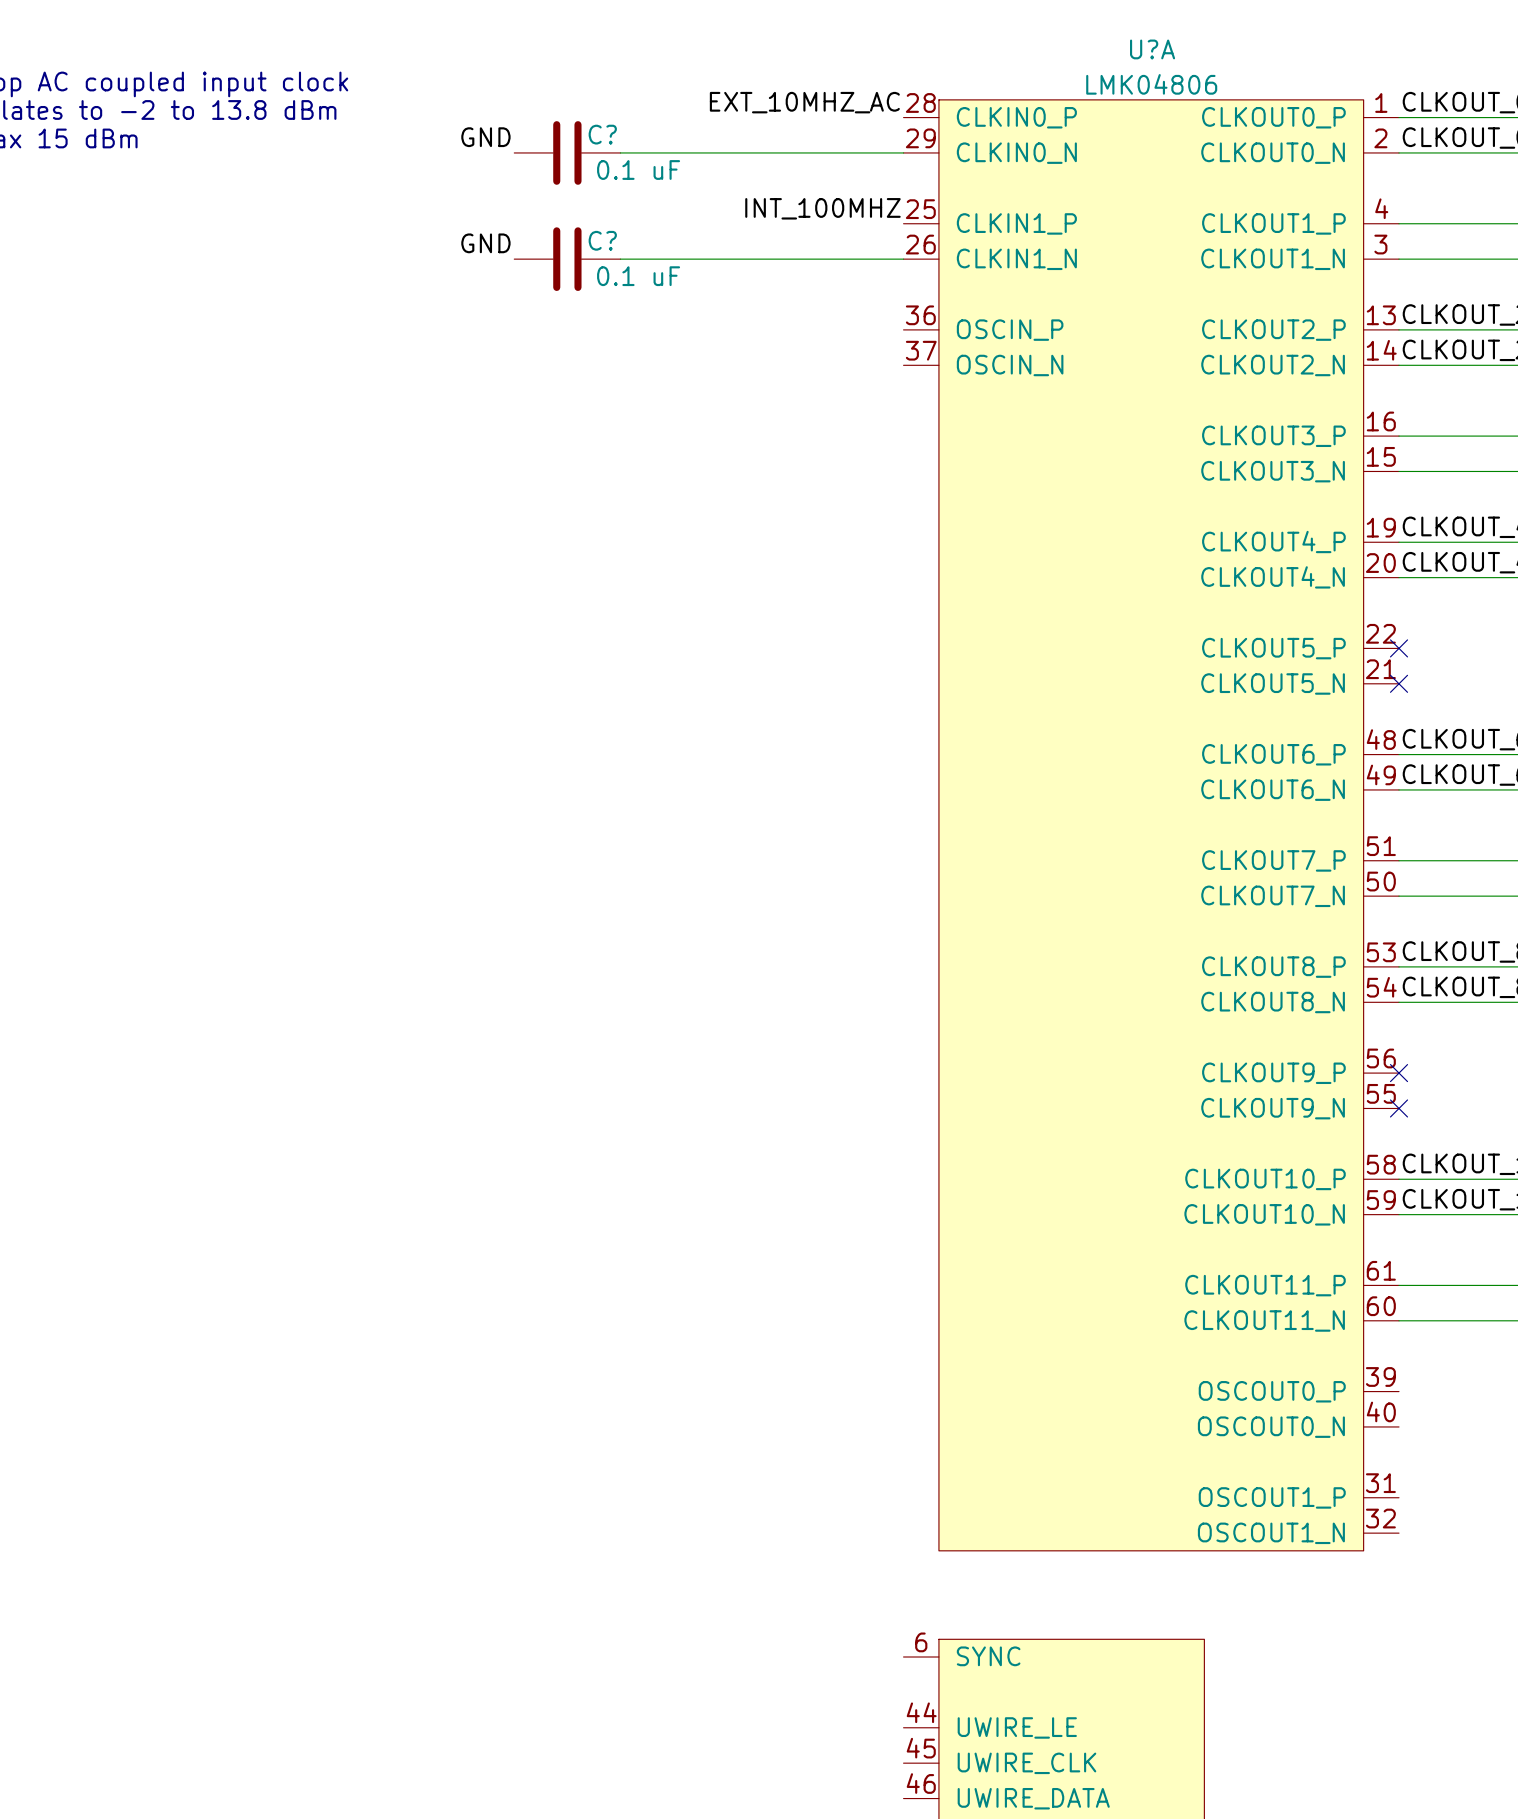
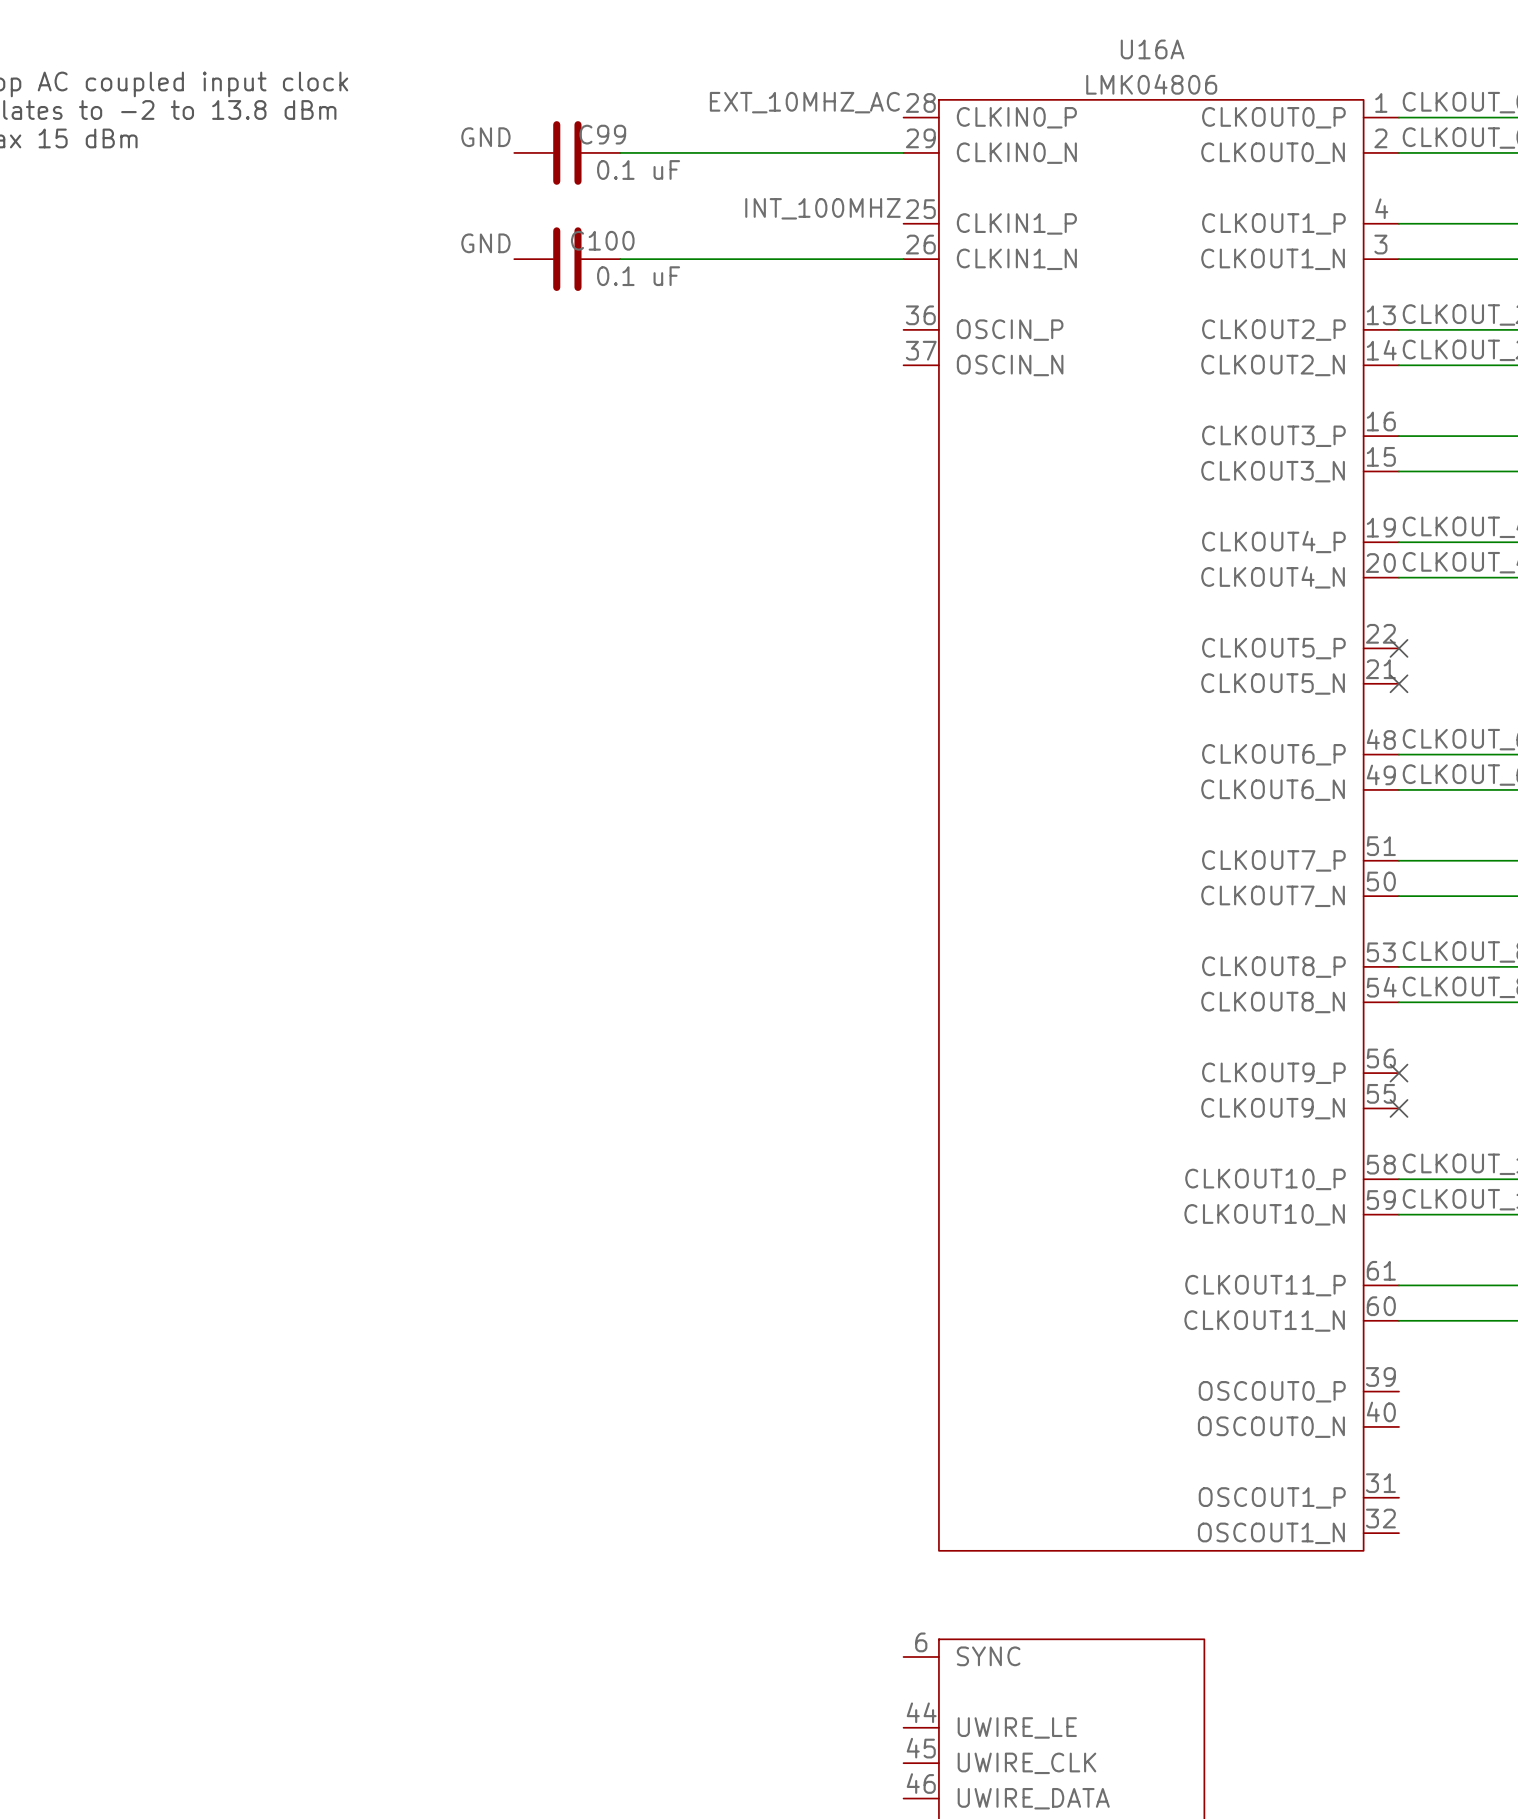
U?A name: U?A (1152, 49) -> U16A (1152, 49)
C? name: C? (602, 134) -> C99 (602, 134)
C? name: C? (602, 240) -> C100 (602, 240)

